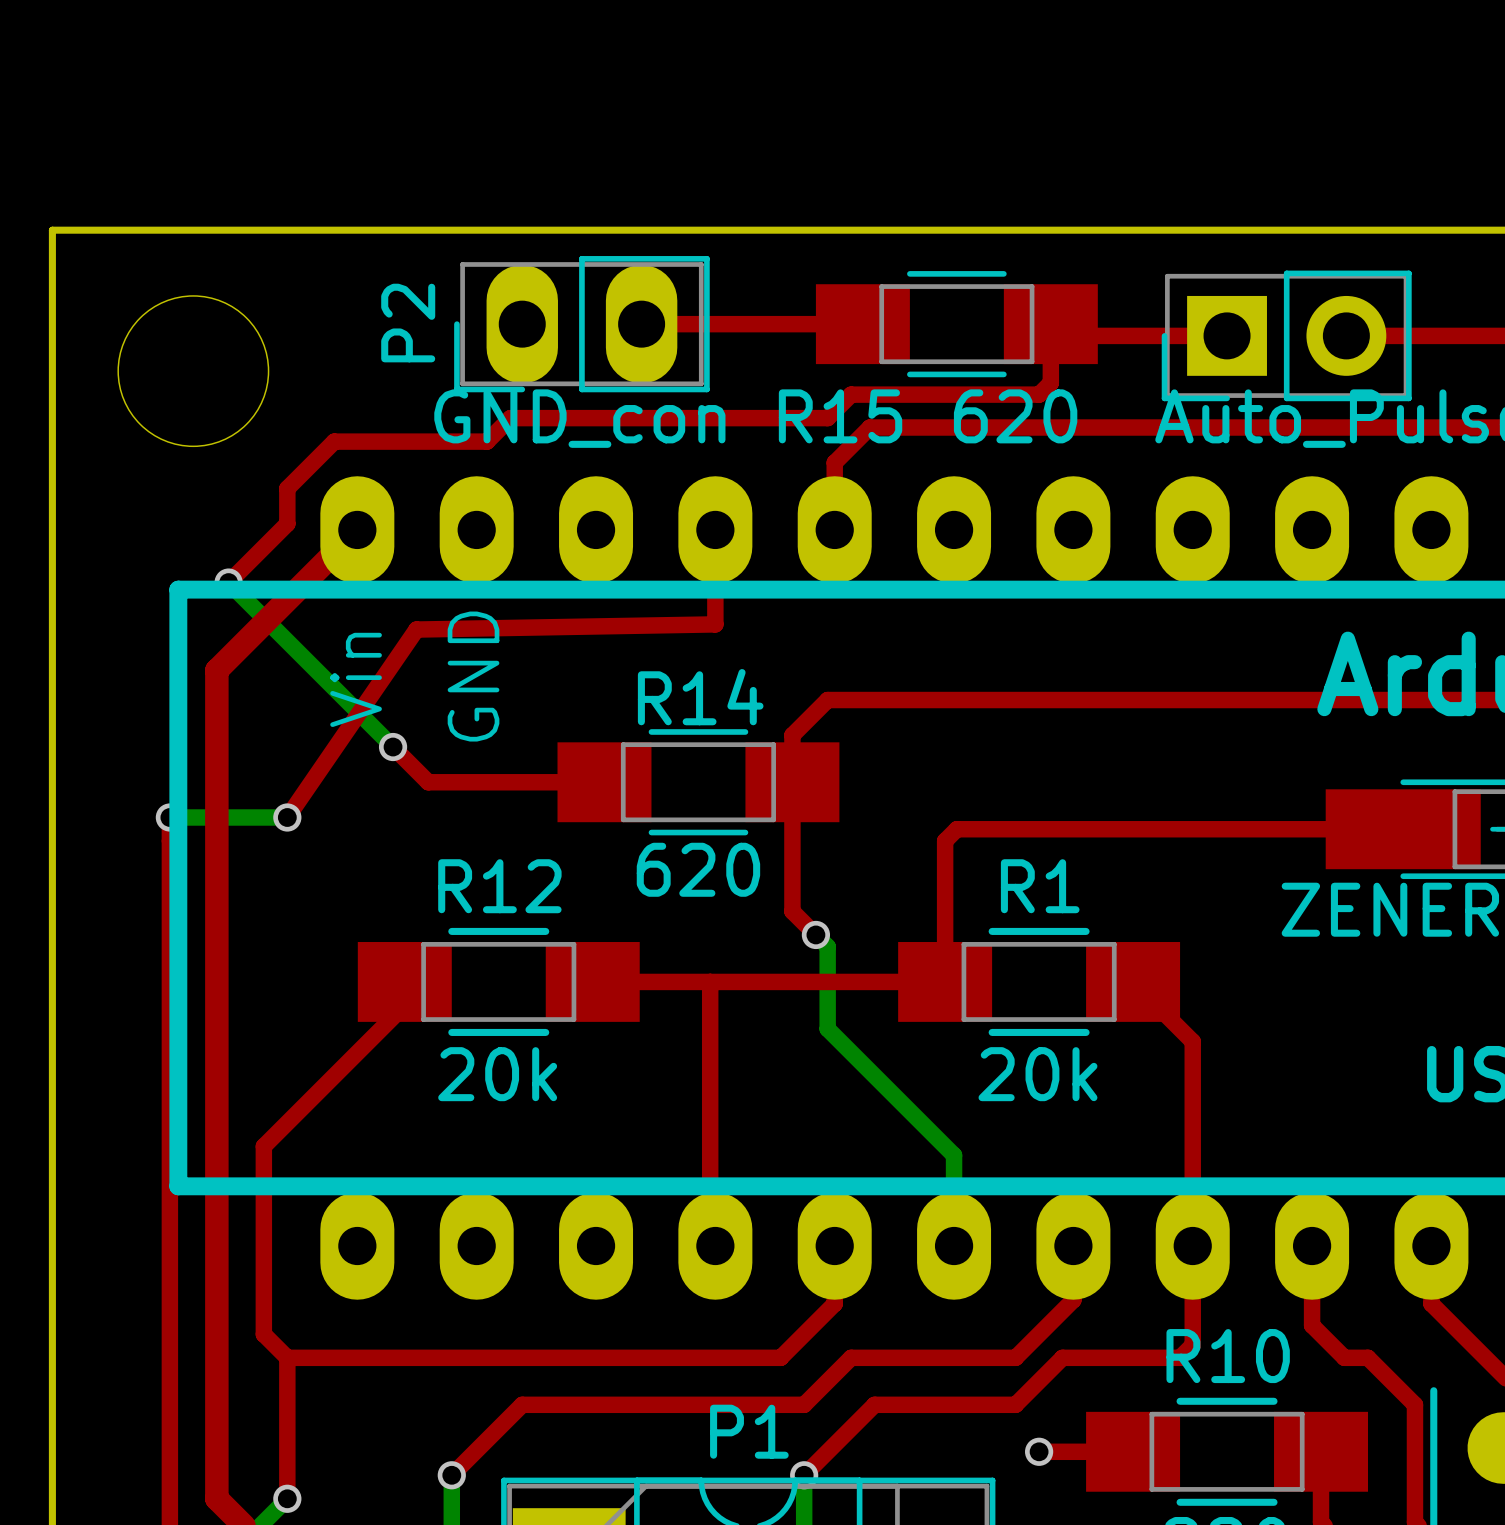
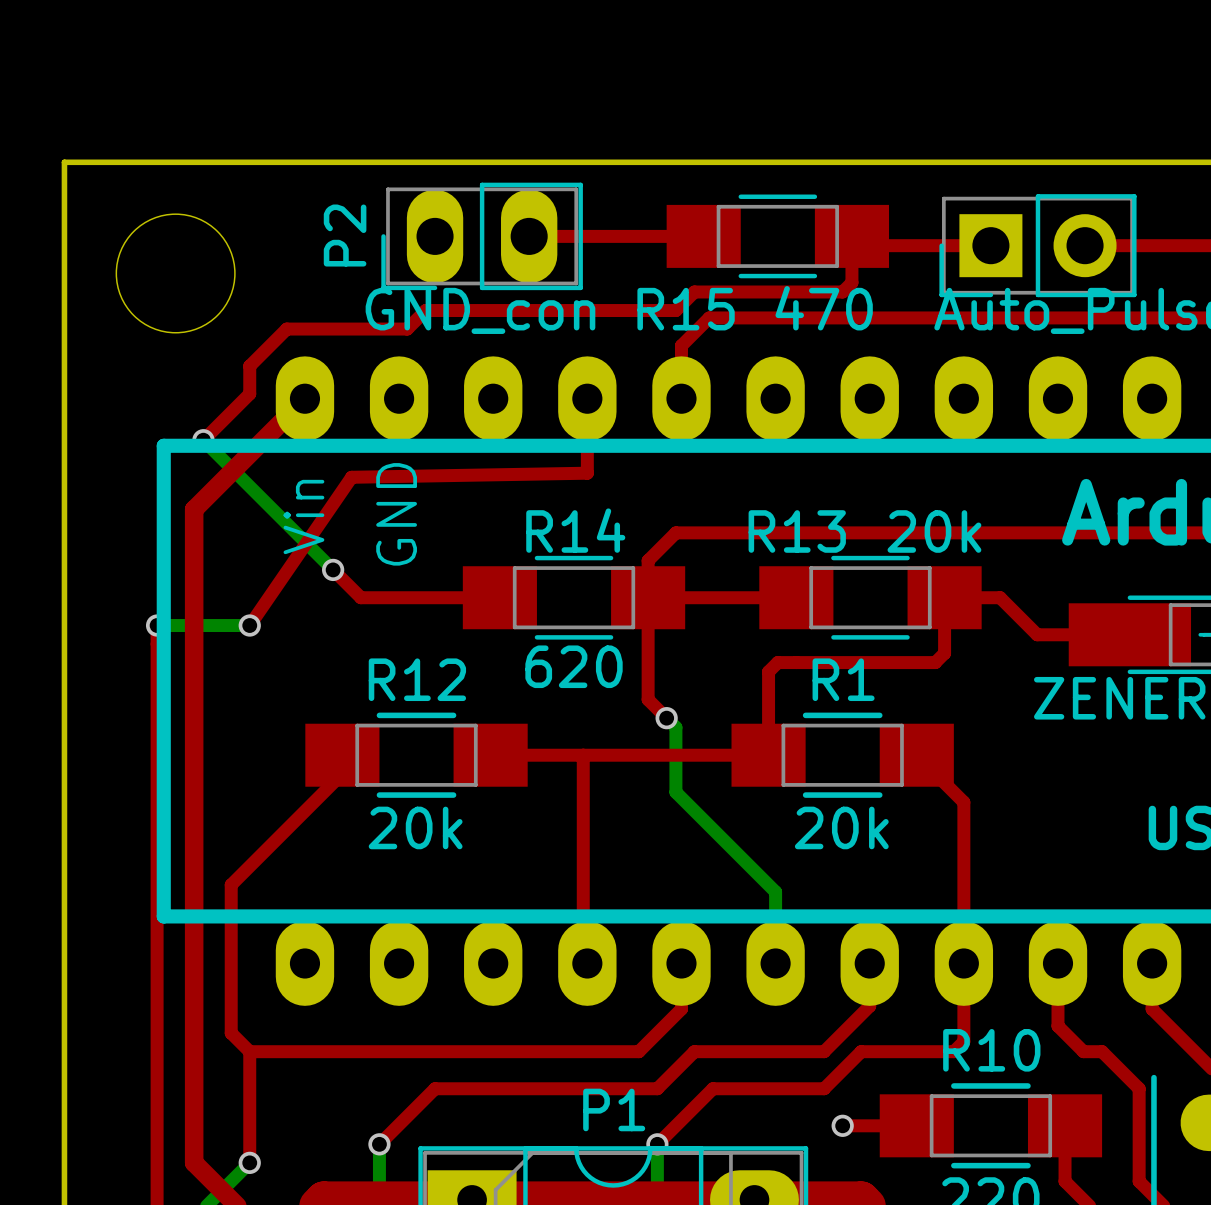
R15 value: 620 (1015, 416) -> 470 (824, 308)
top track: none -> (648, 597) (796, 597)
R13: none -> 20k (870, 597)
top track: (1285, 829) (956, 829) (945, 840) (945, 876) -> (1037, 634) (1000, 597) (944, 597) (944, 653) (935, 662) (777, 662) (768, 671)

